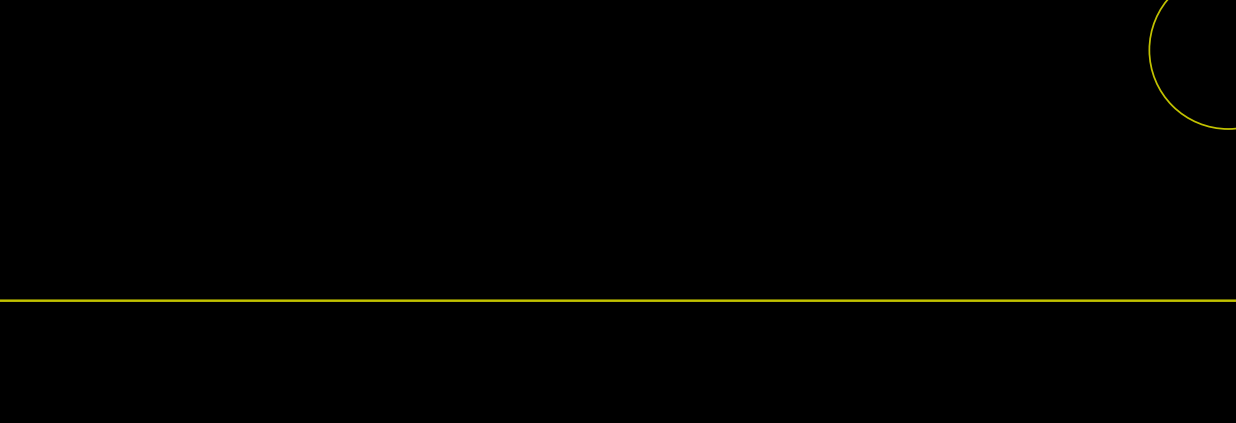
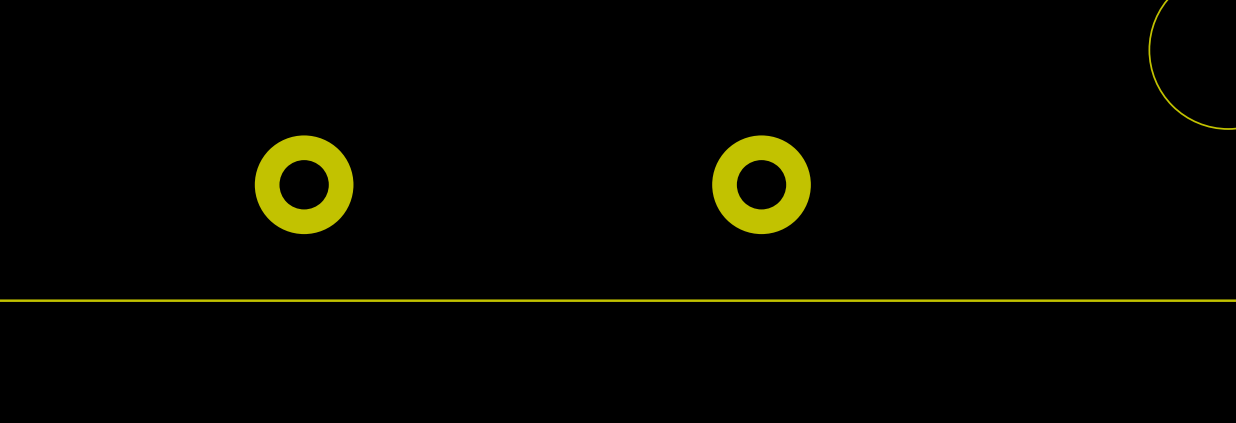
part: none -> (304, 184)
part: none -> (761, 184)

